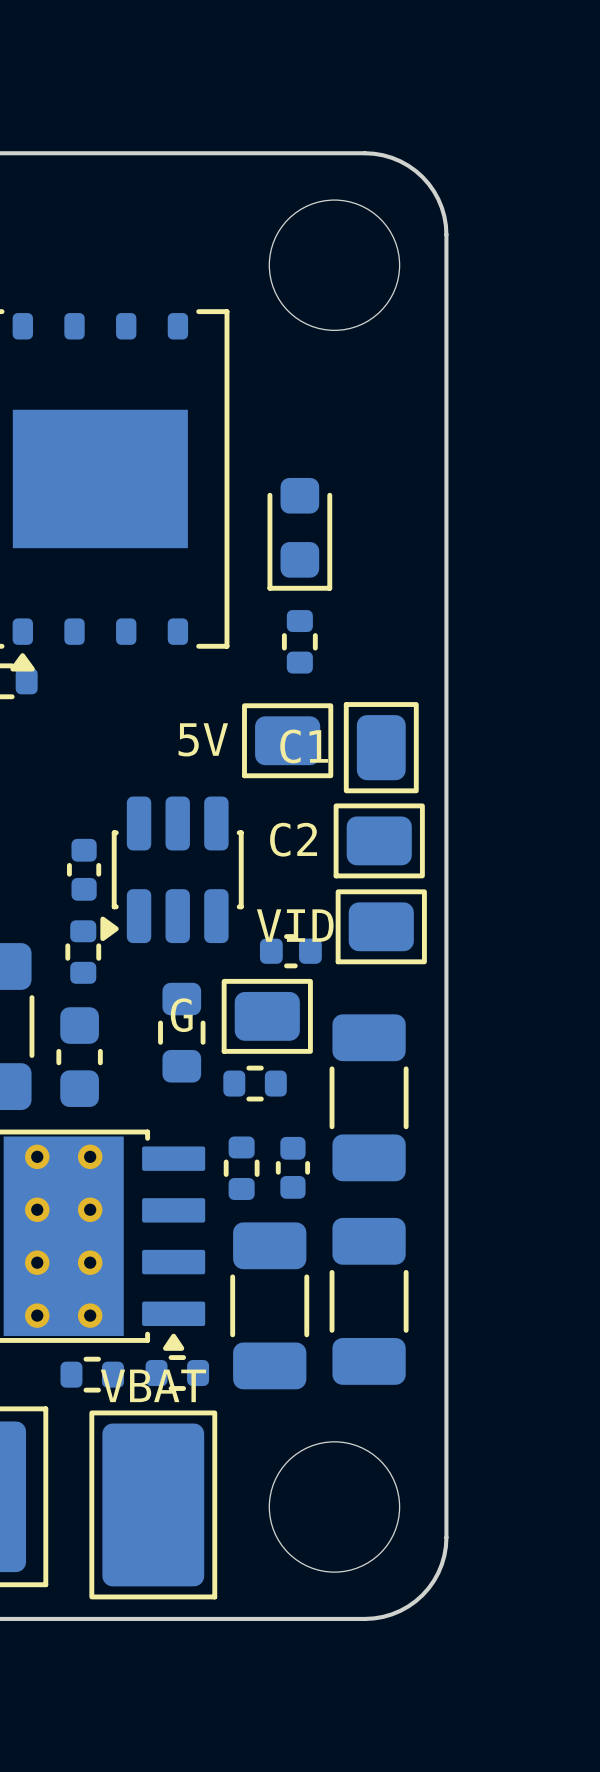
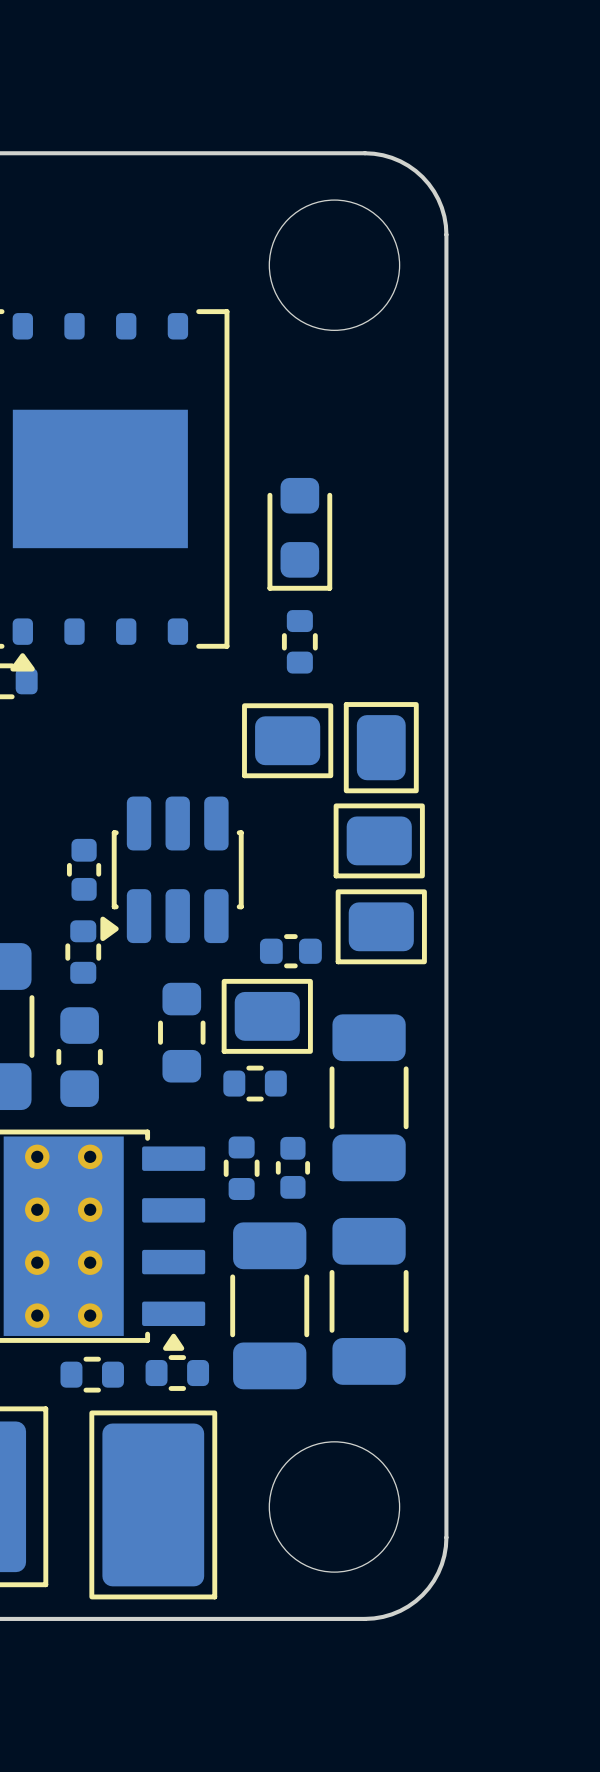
text: 5V (203, 739) -> none
text: C1 (304, 746) -> none
text: C2 (293, 839) -> none
text: VID (295, 925) -> none
text: G (181, 1015) -> none
text: VBAT (153, 1385) -> none

